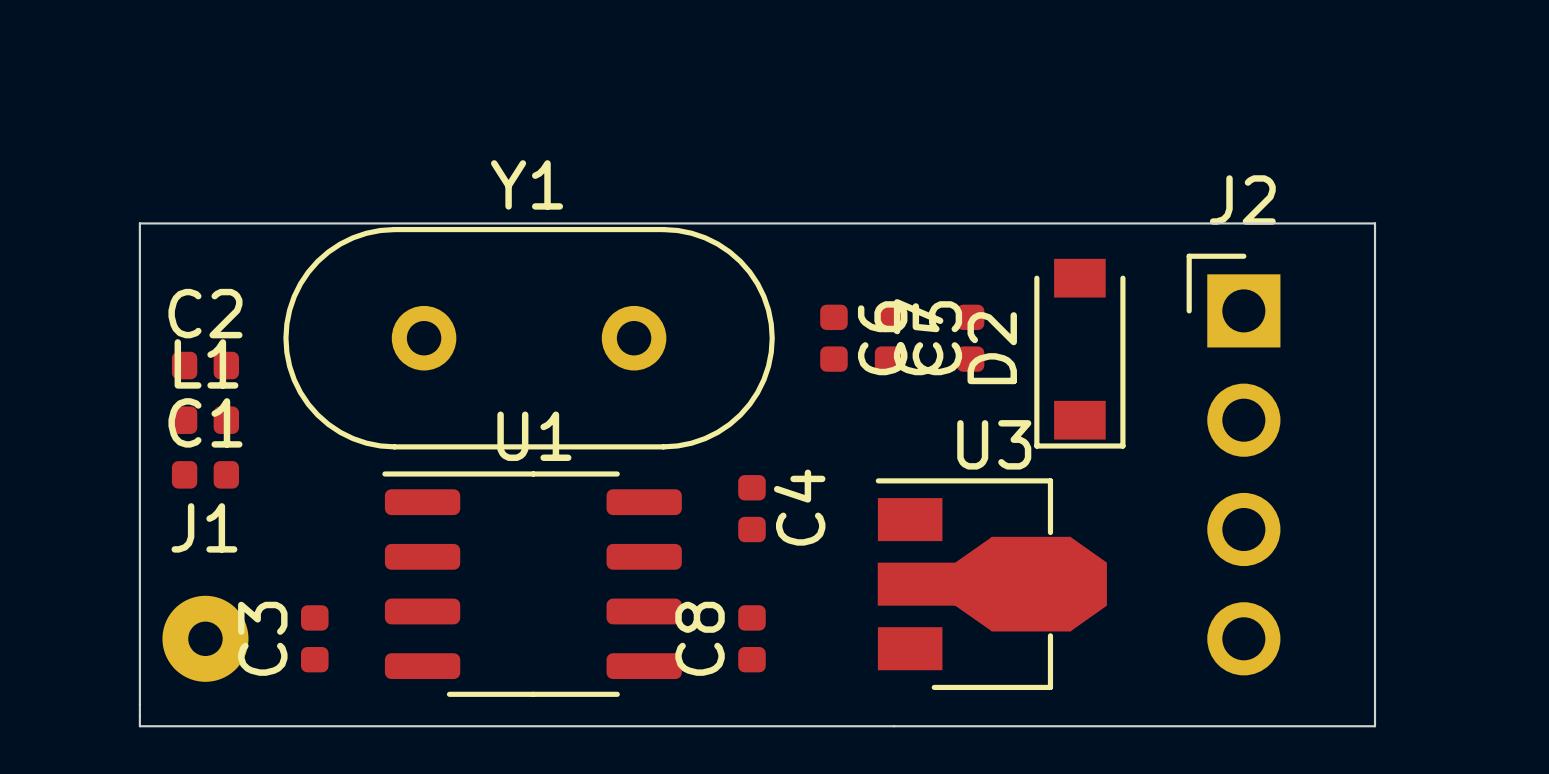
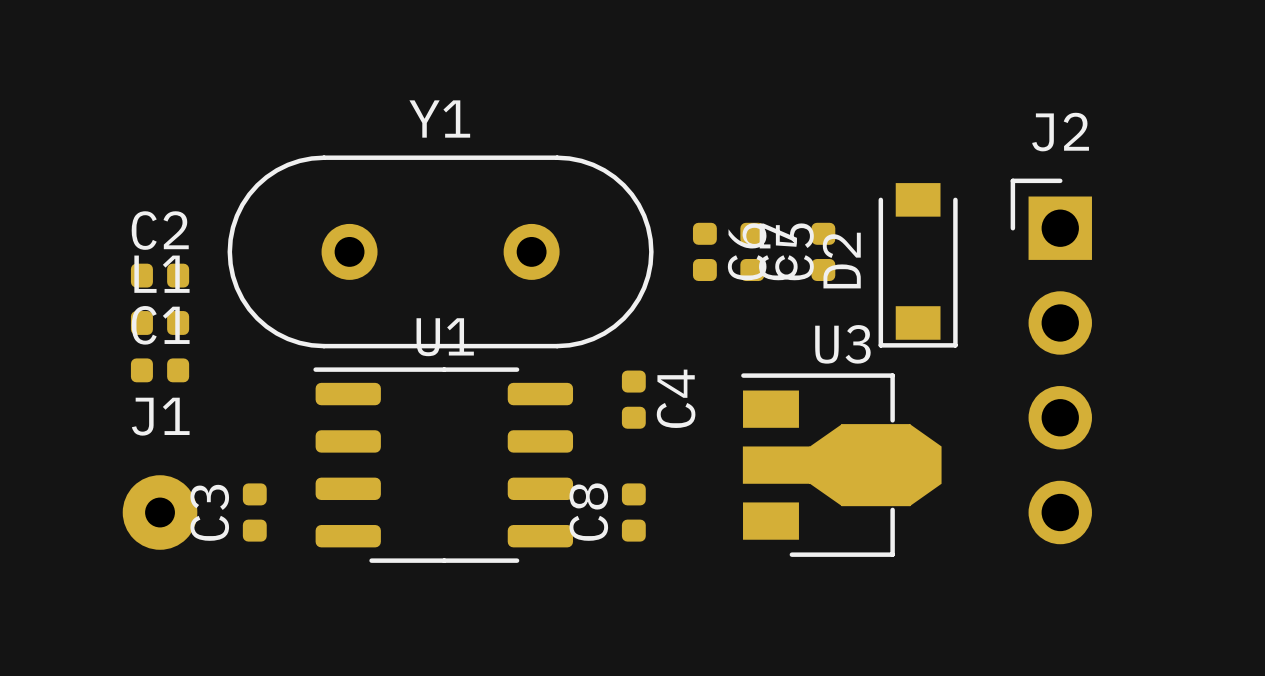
board edge: (139, 223) (1375, 223) (1375, 726) (139, 726) (139, 223) -> none

